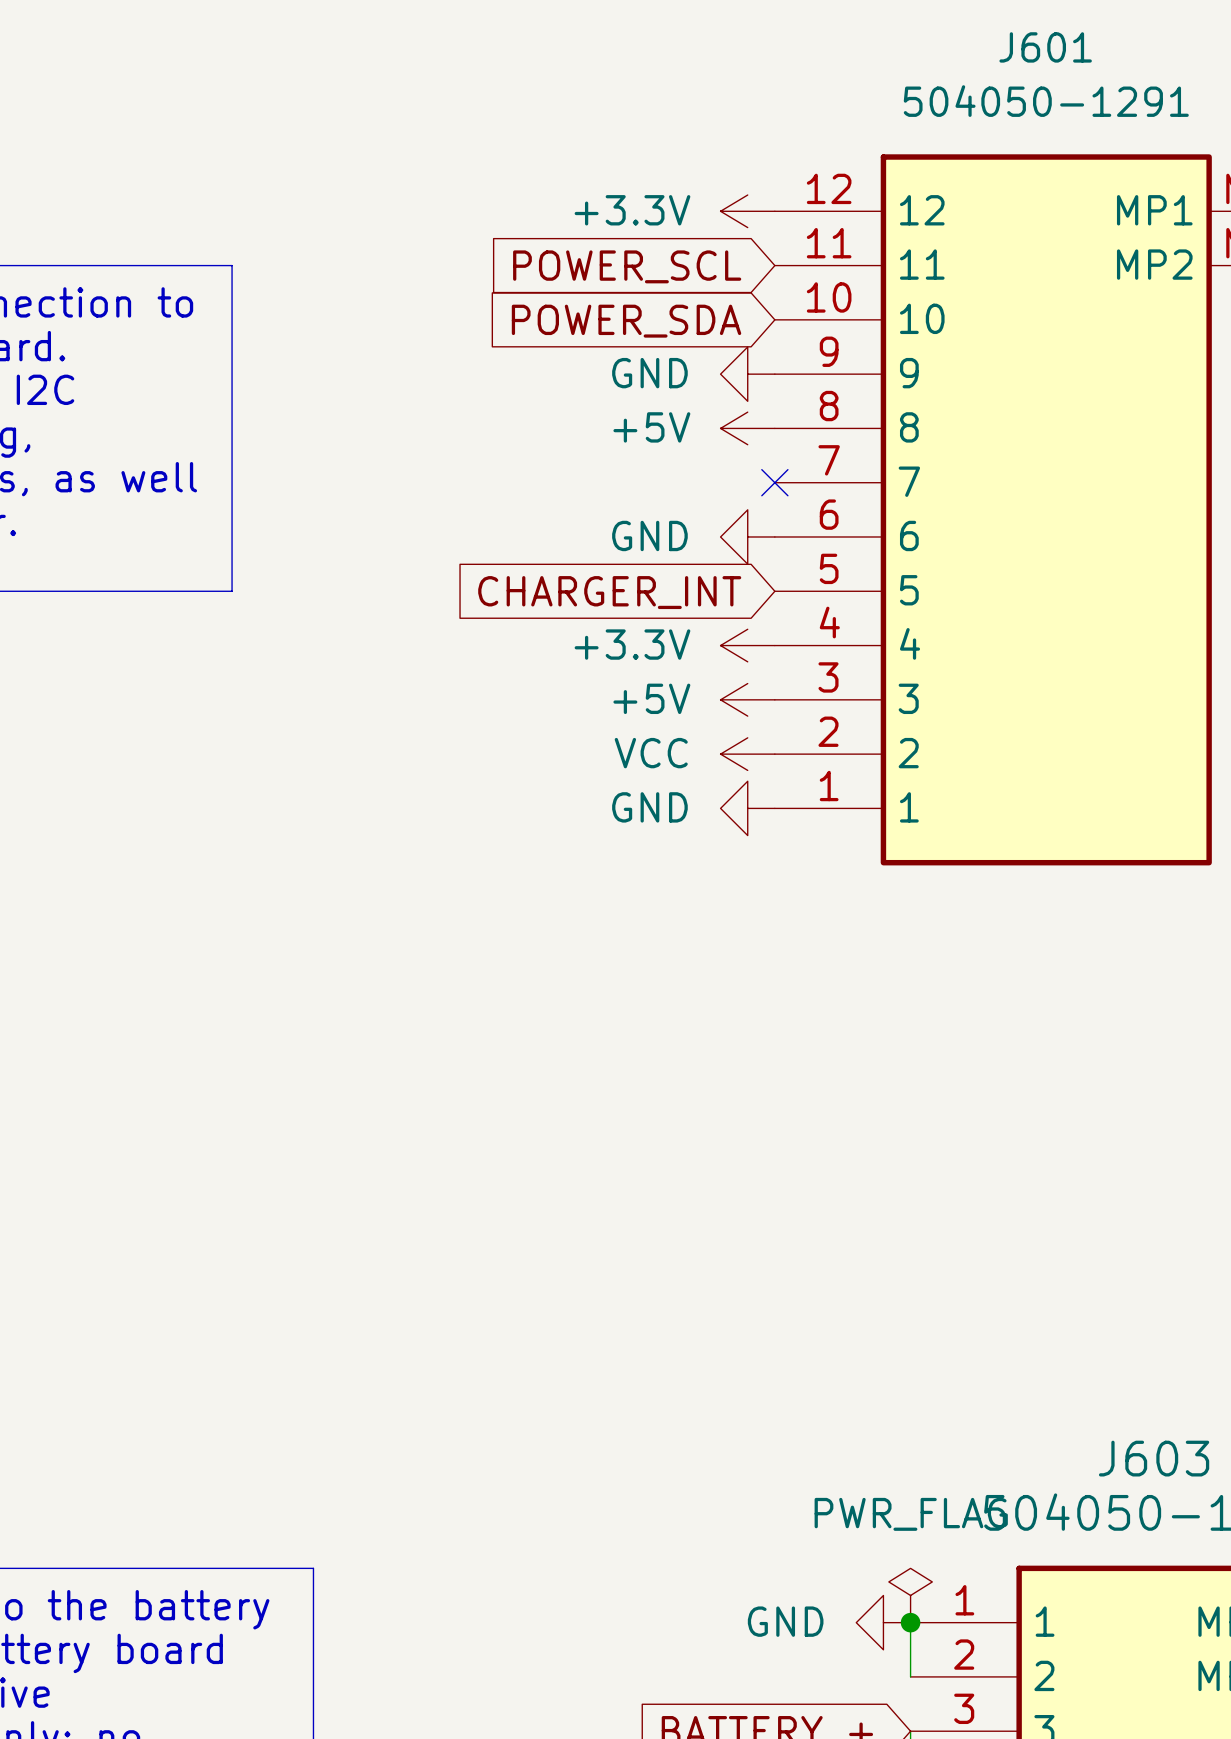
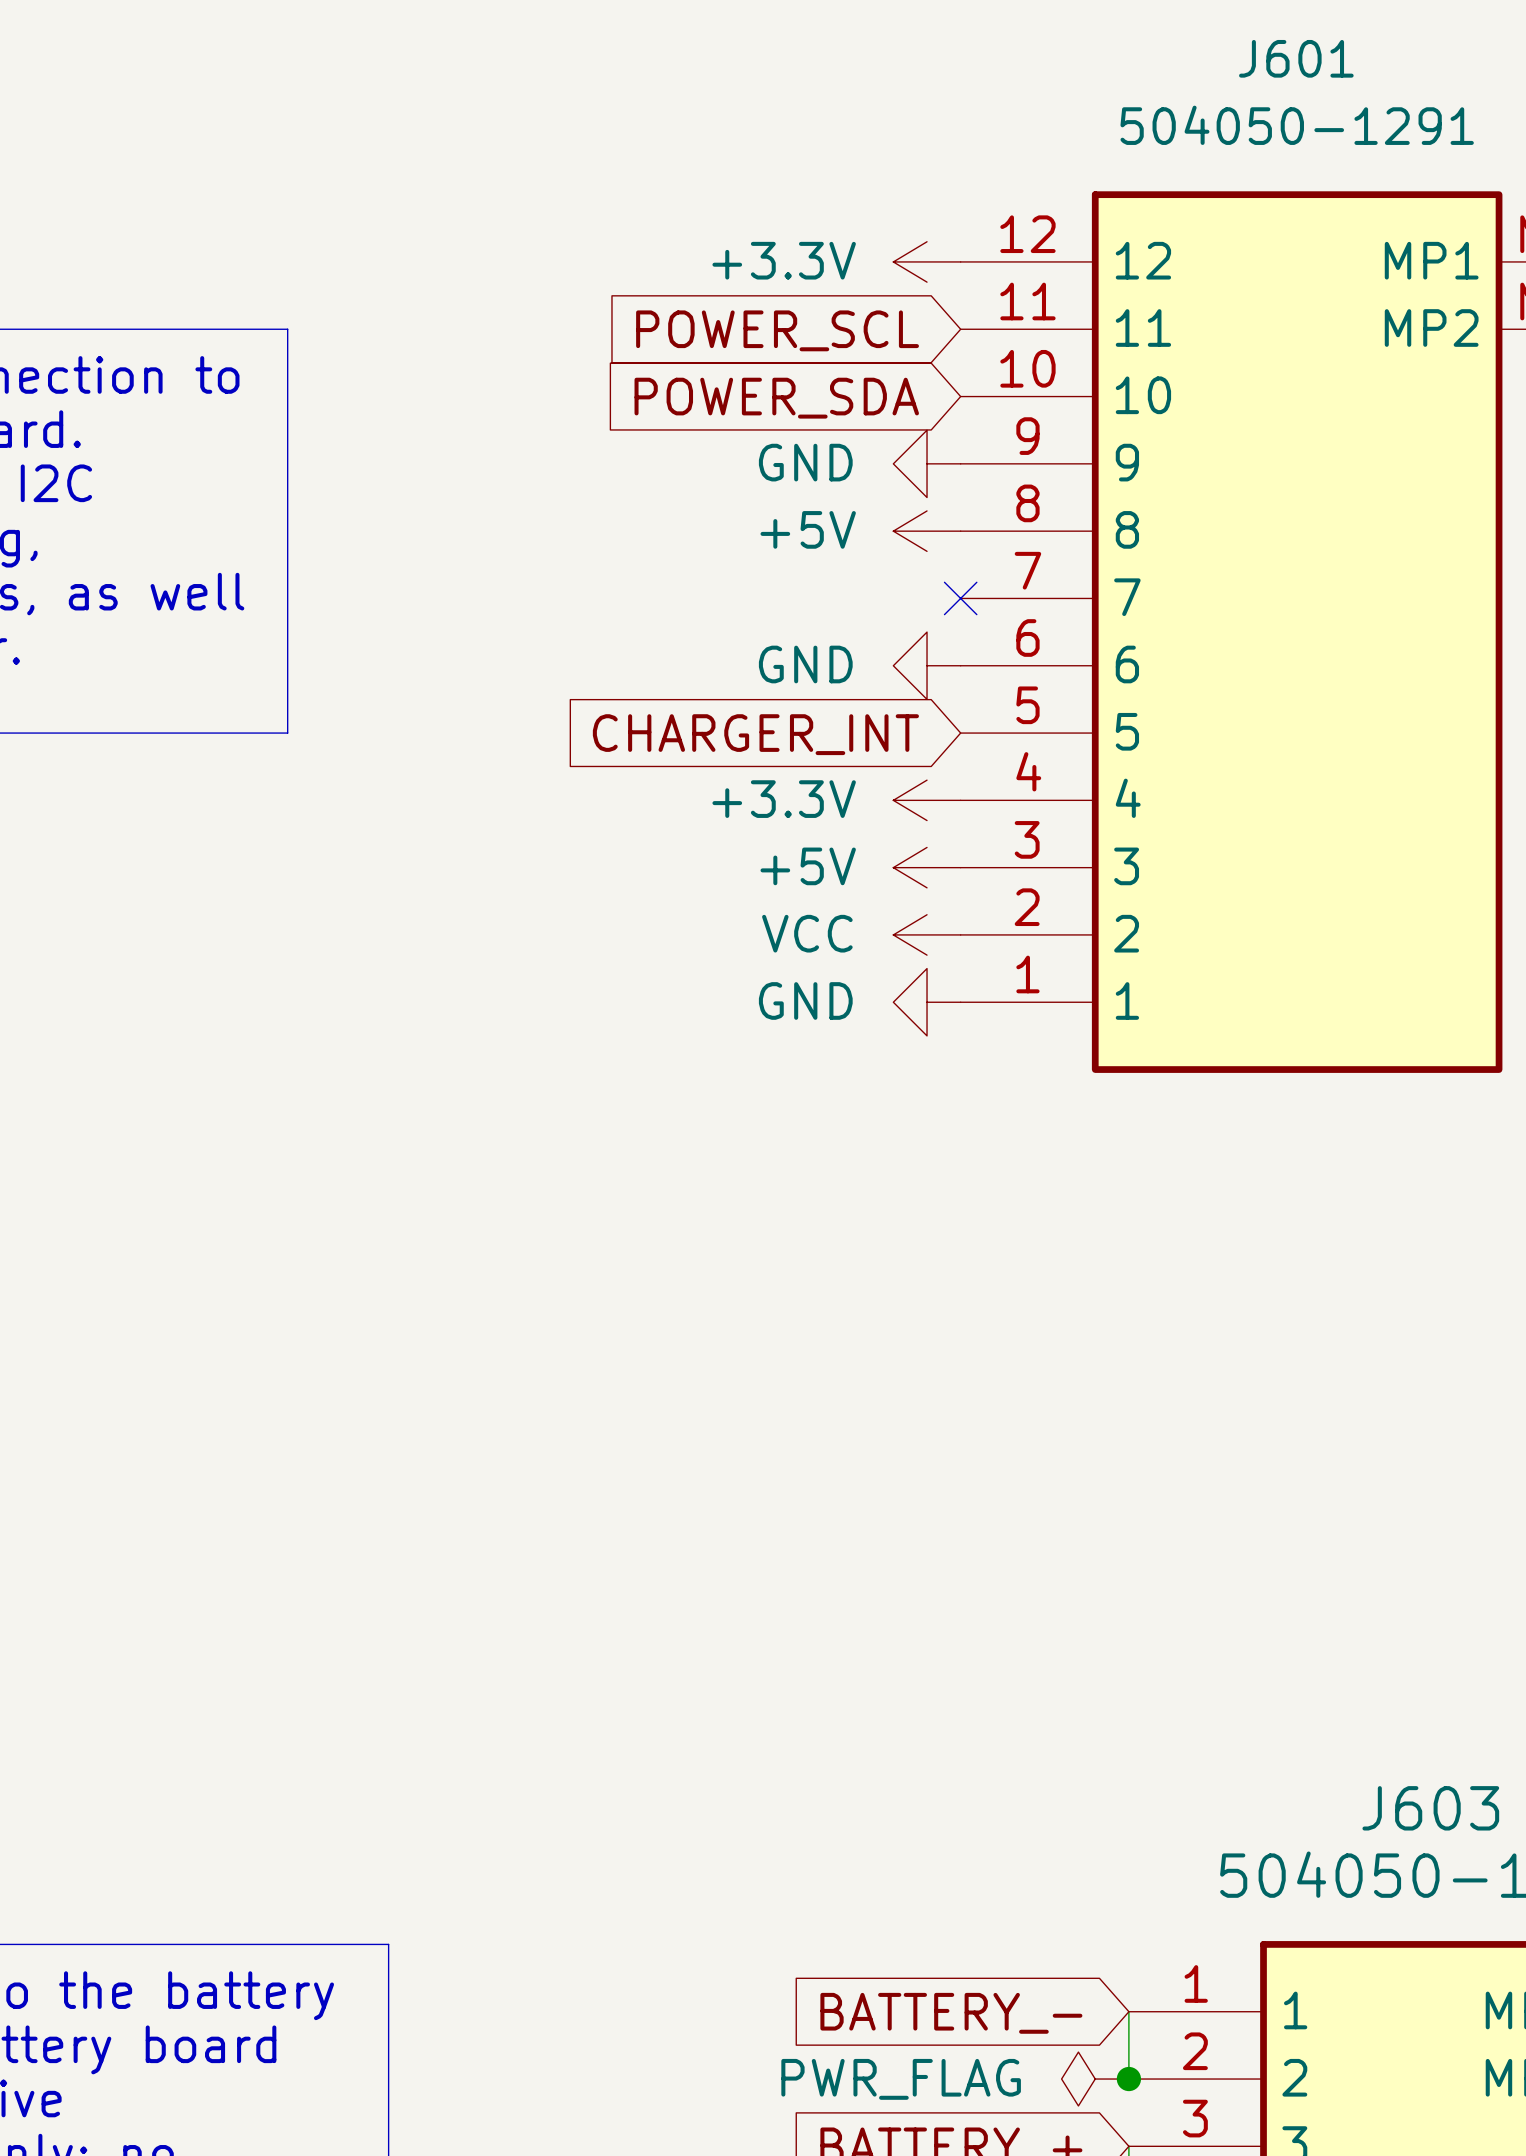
power symbol text position: PWR_FLAG (911, 1514) -> PWR_FLAG (901, 2079)
power symbol rotation: 0° (910, 1595) -> 90° counterclockwise (1095, 2079)
power symbol position: PWR_FLAG (910, 1595) -> PWR_FLAG (1095, 2079)
power symbol: GND (883, 1622) -> none
junction position: (910, 1622) -> (1128, 2079)
global label: none -> BATTERY_- (951, 2013)

